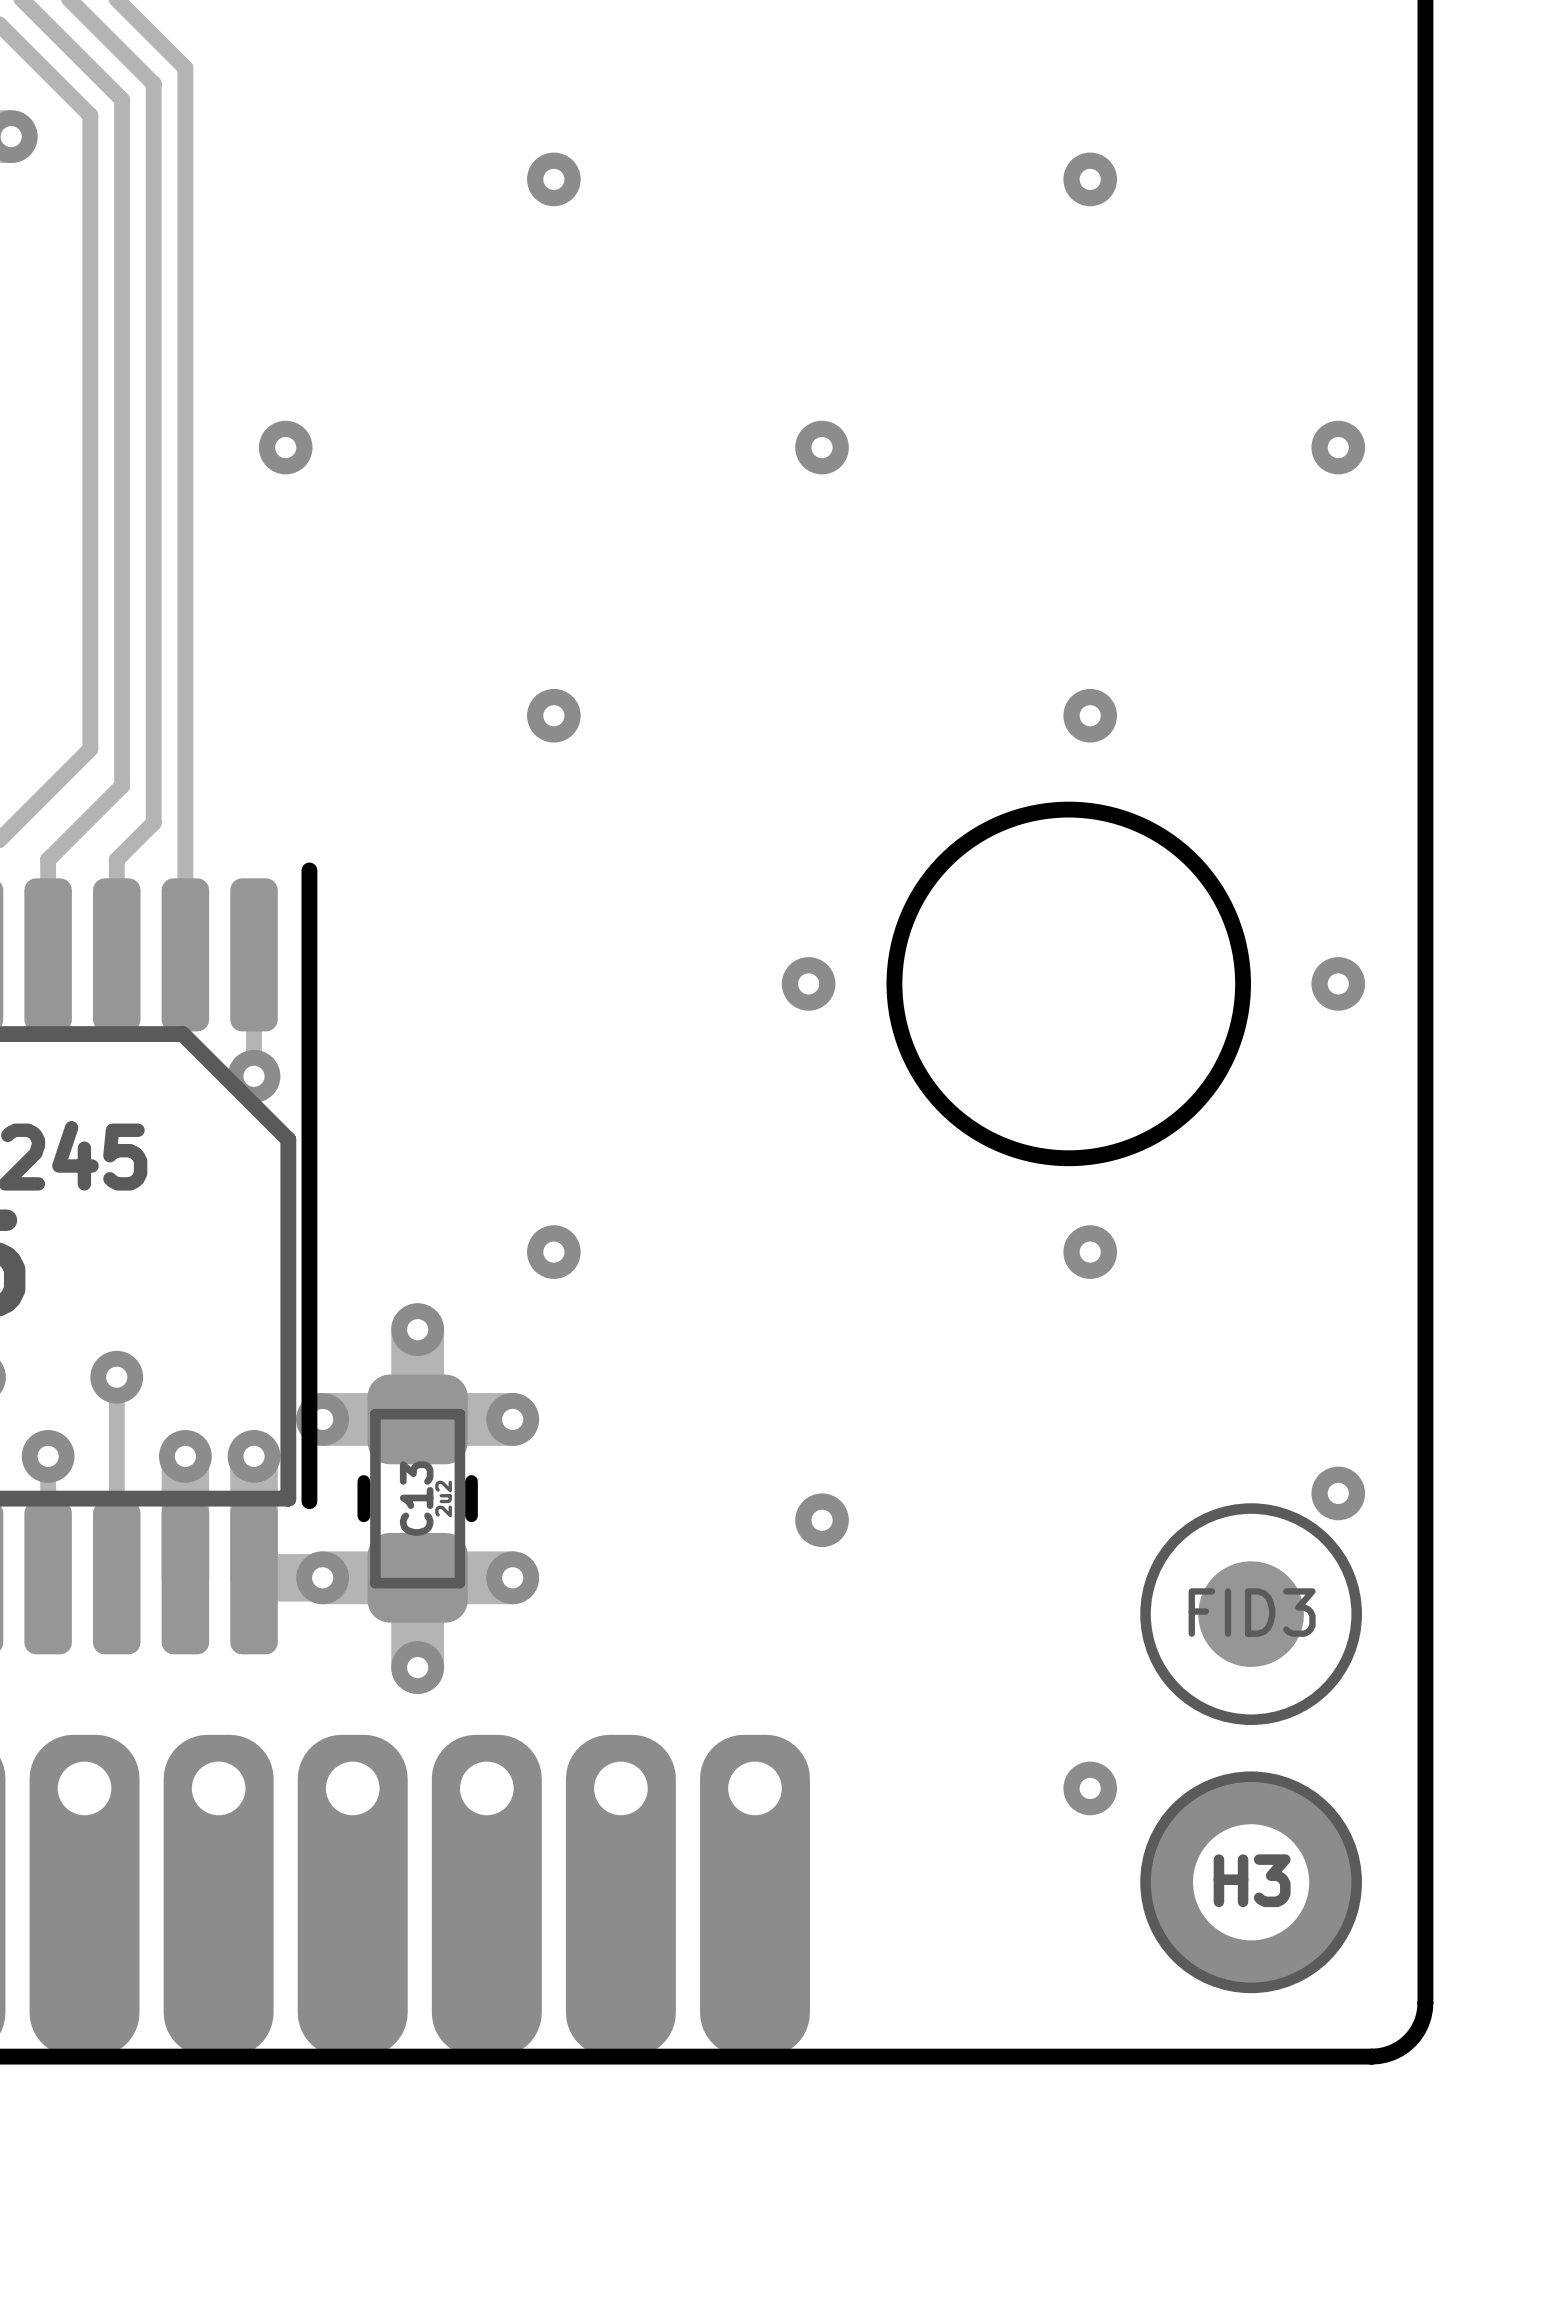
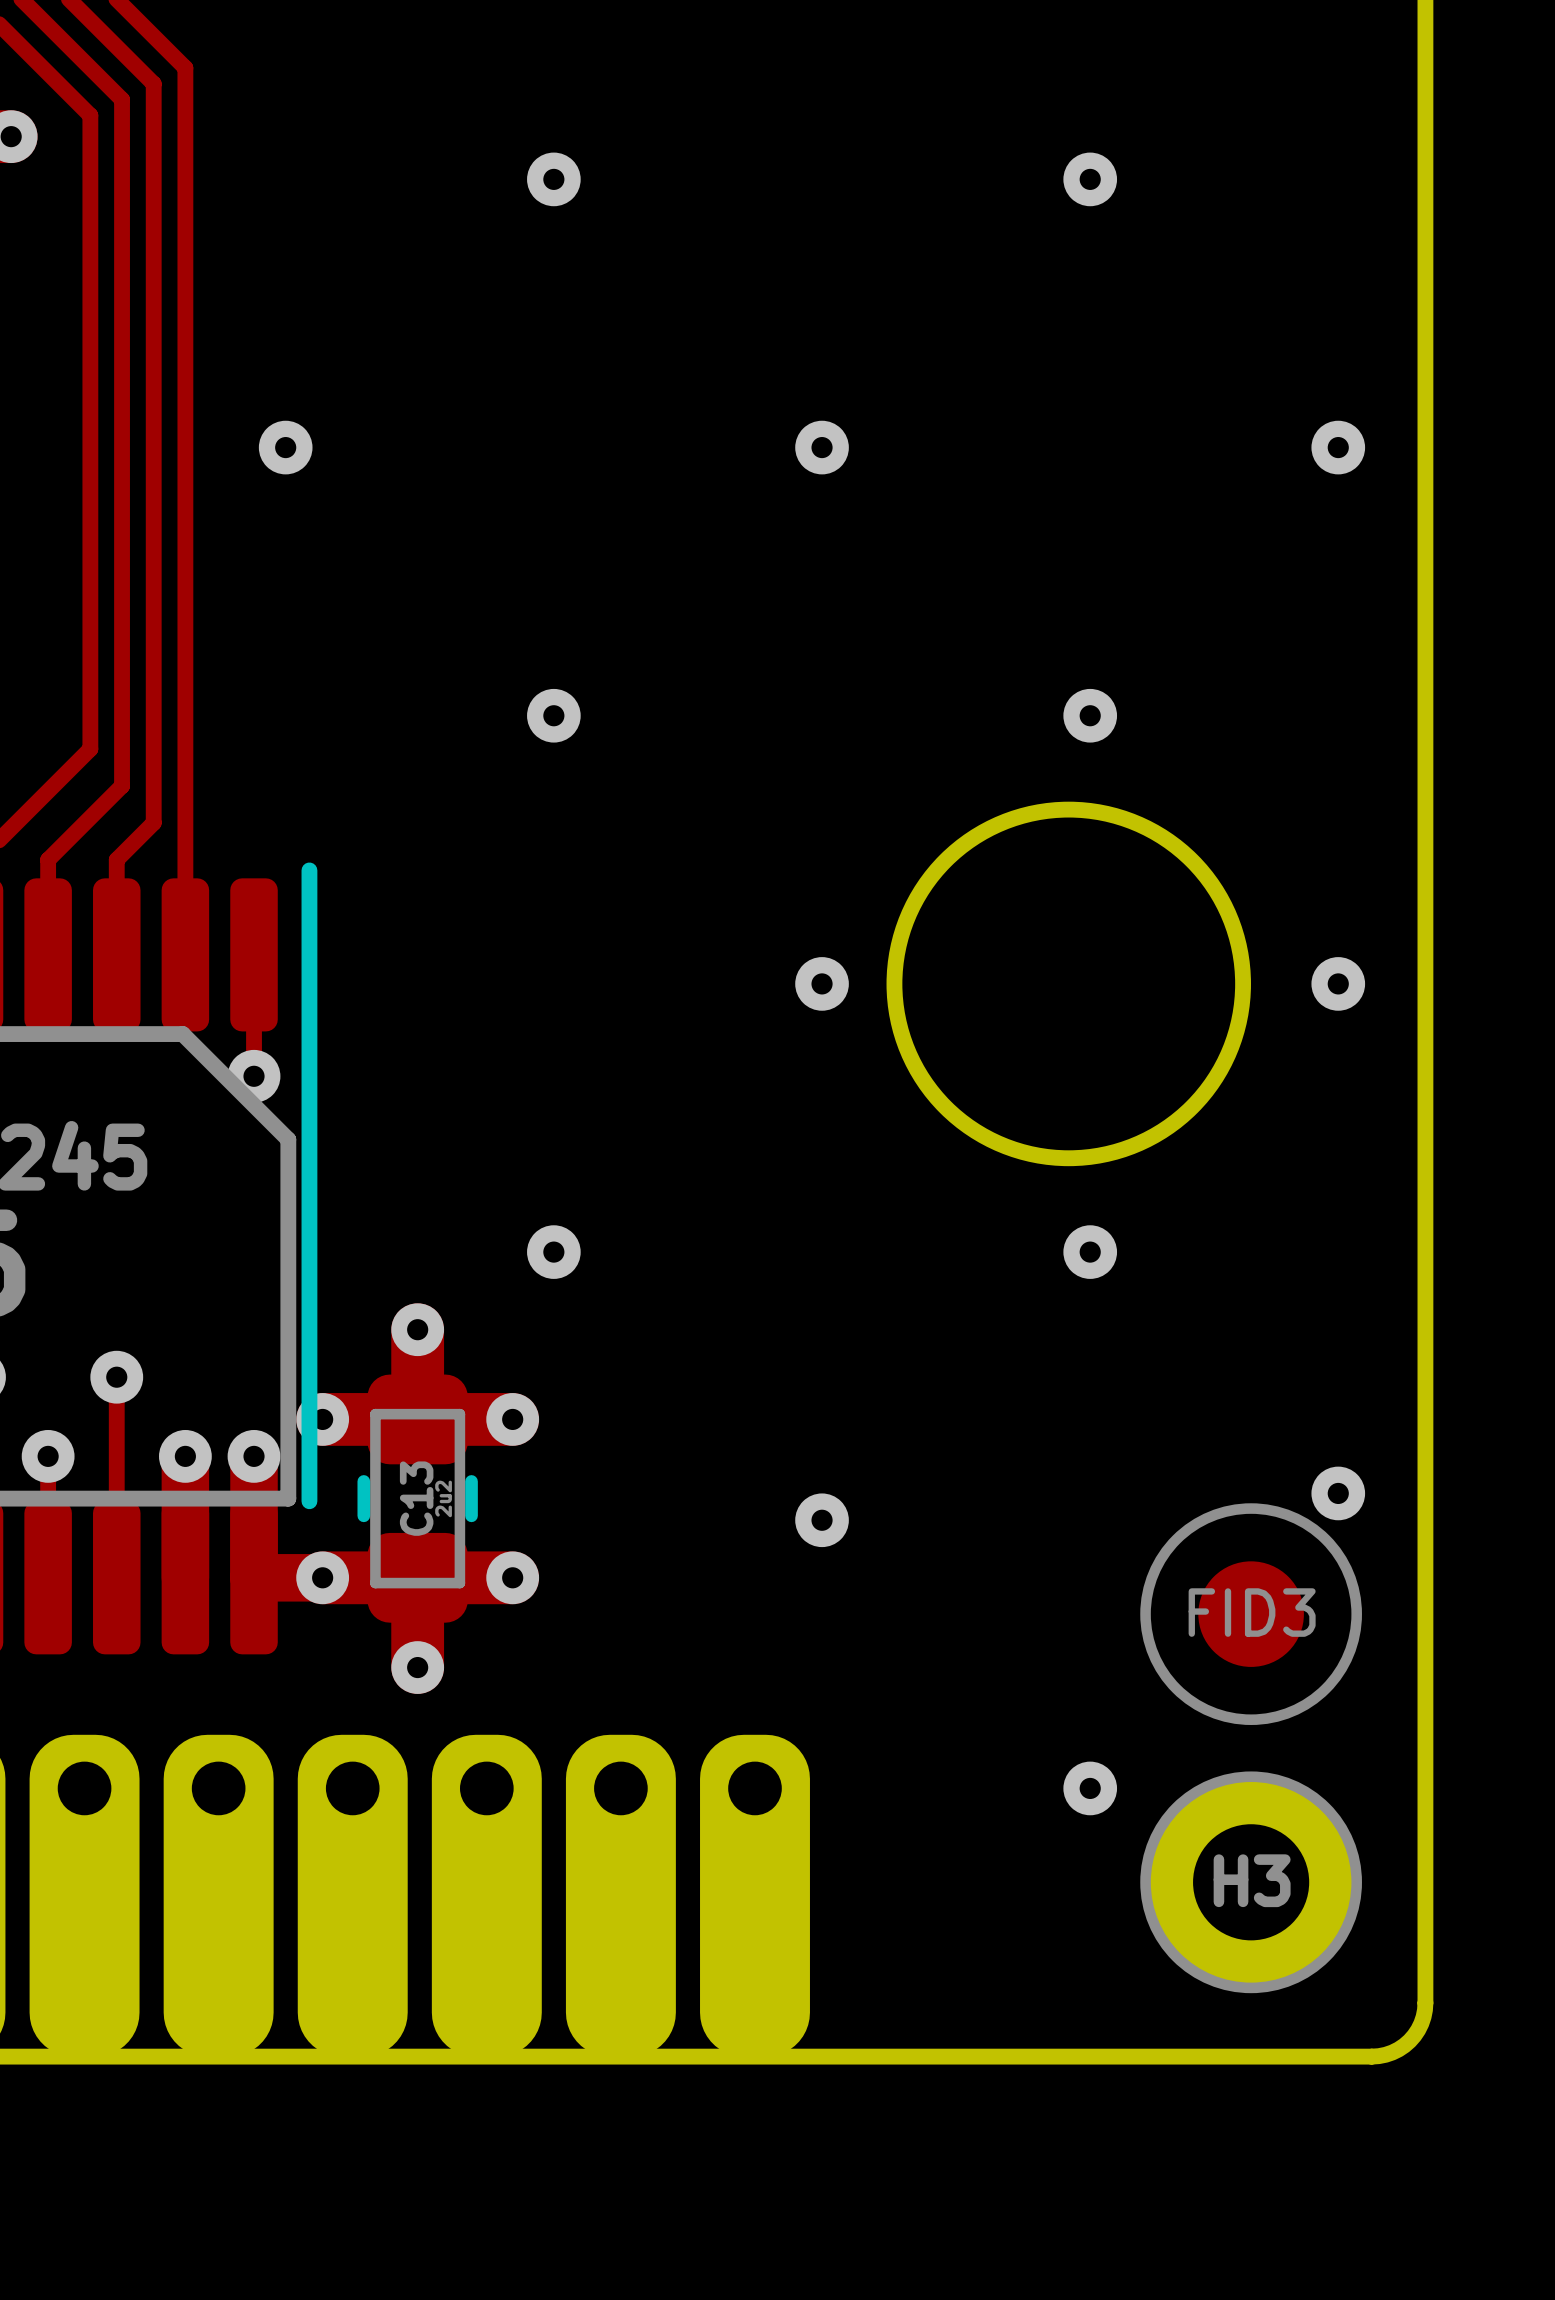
via position: (808, 983) -> (822, 983)

